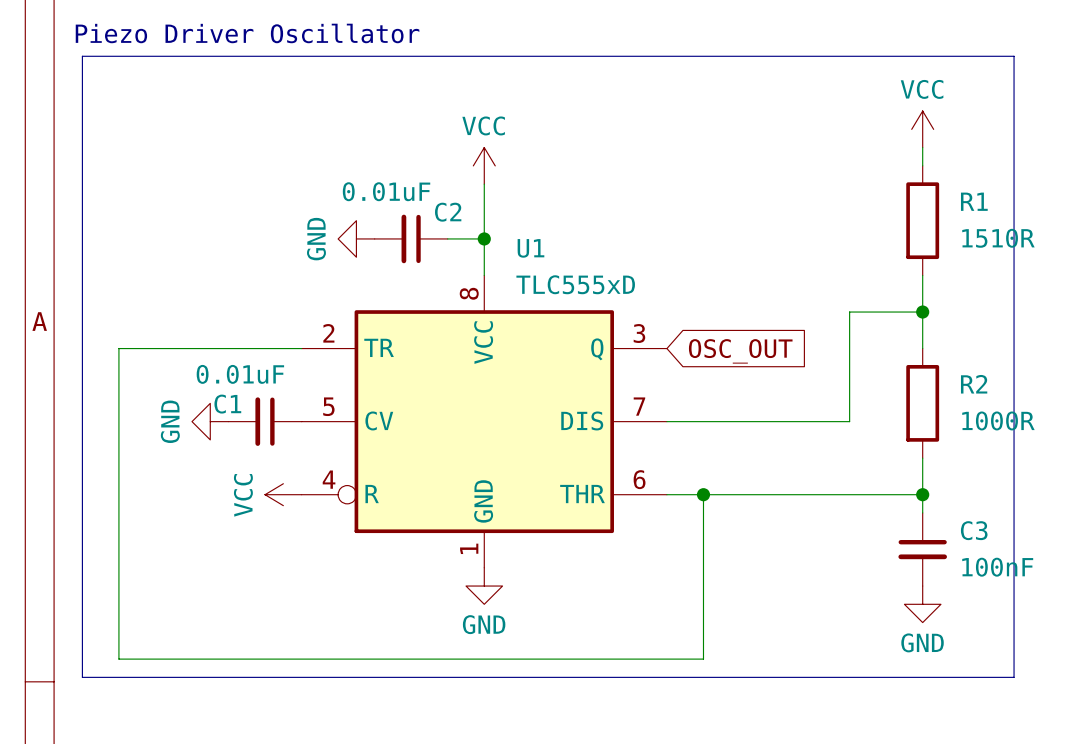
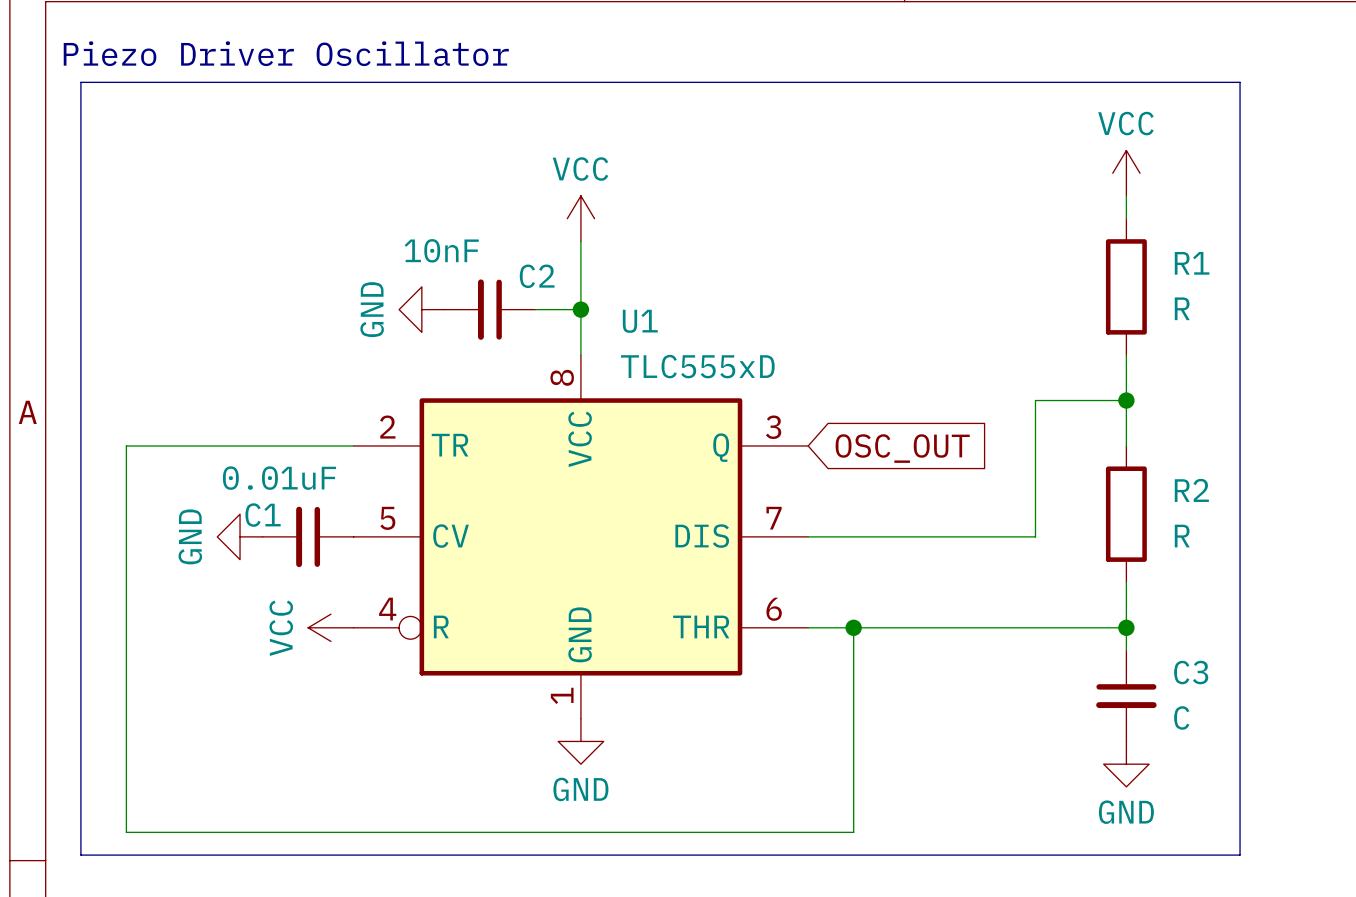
C2 value: 0.01uF (386, 191) -> 10nF (441, 250)
R1 value: 1510R (998, 238) -> R (1182, 308)
R2 value: 1000R (998, 420) -> R (1182, 536)
C3 value: 100nF (997, 567) -> C (1181, 717)

